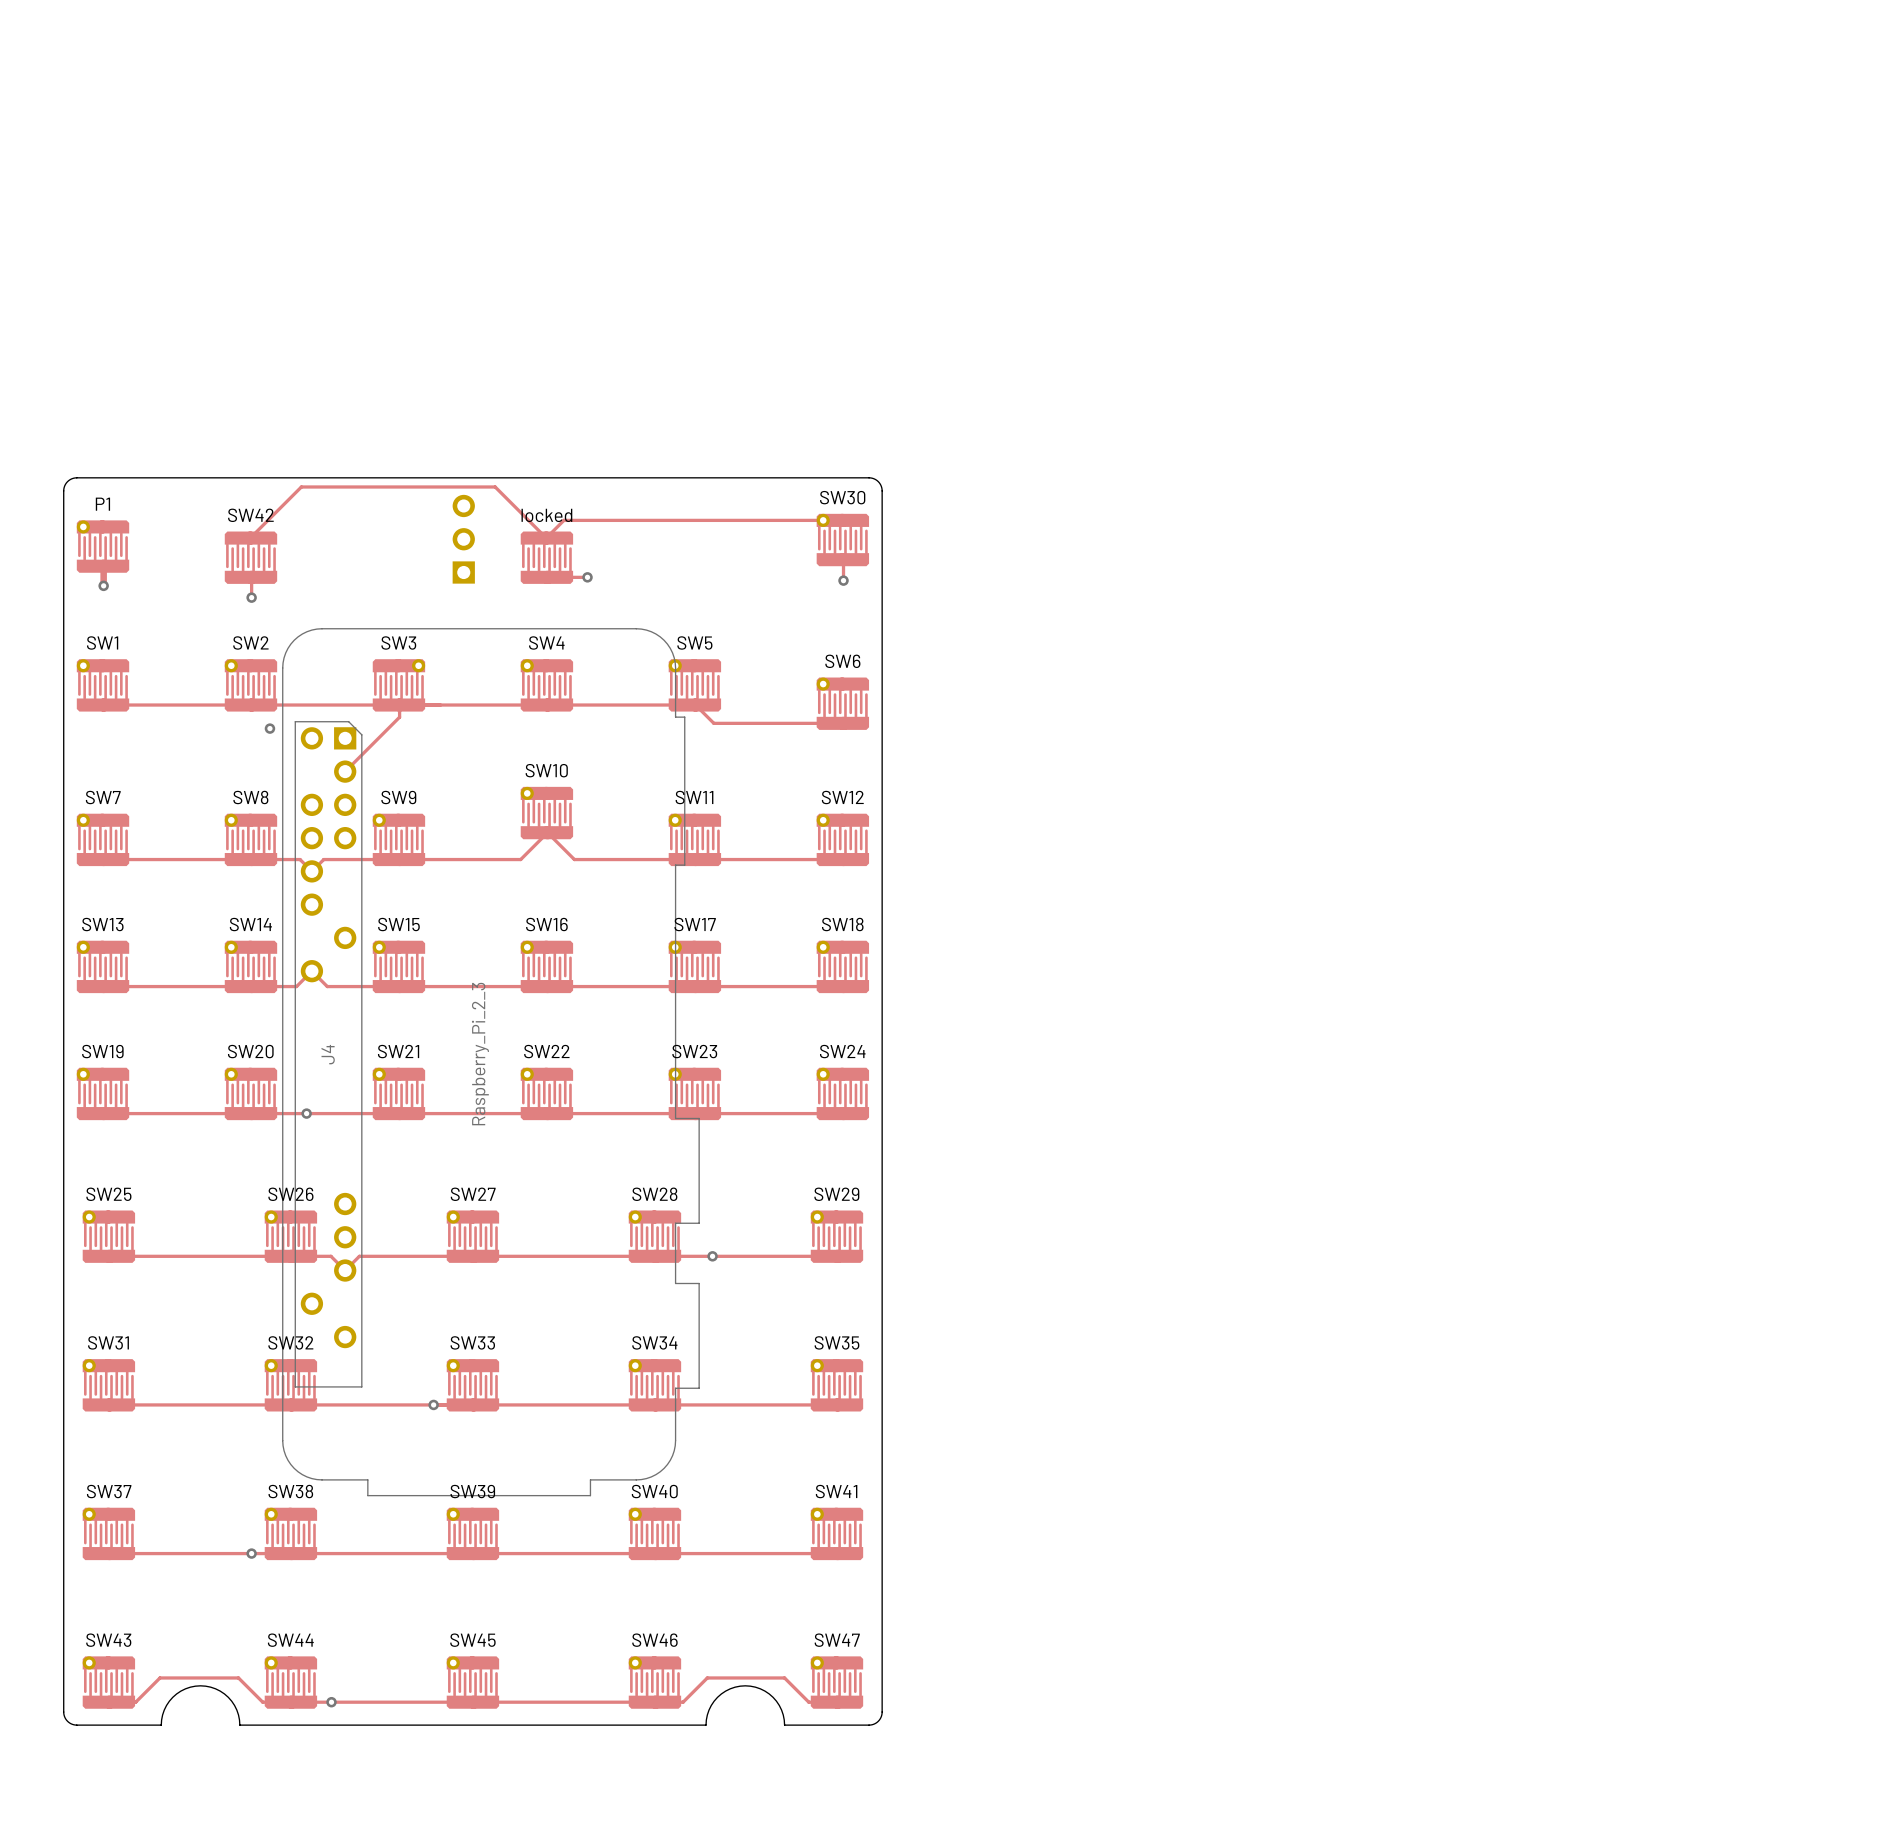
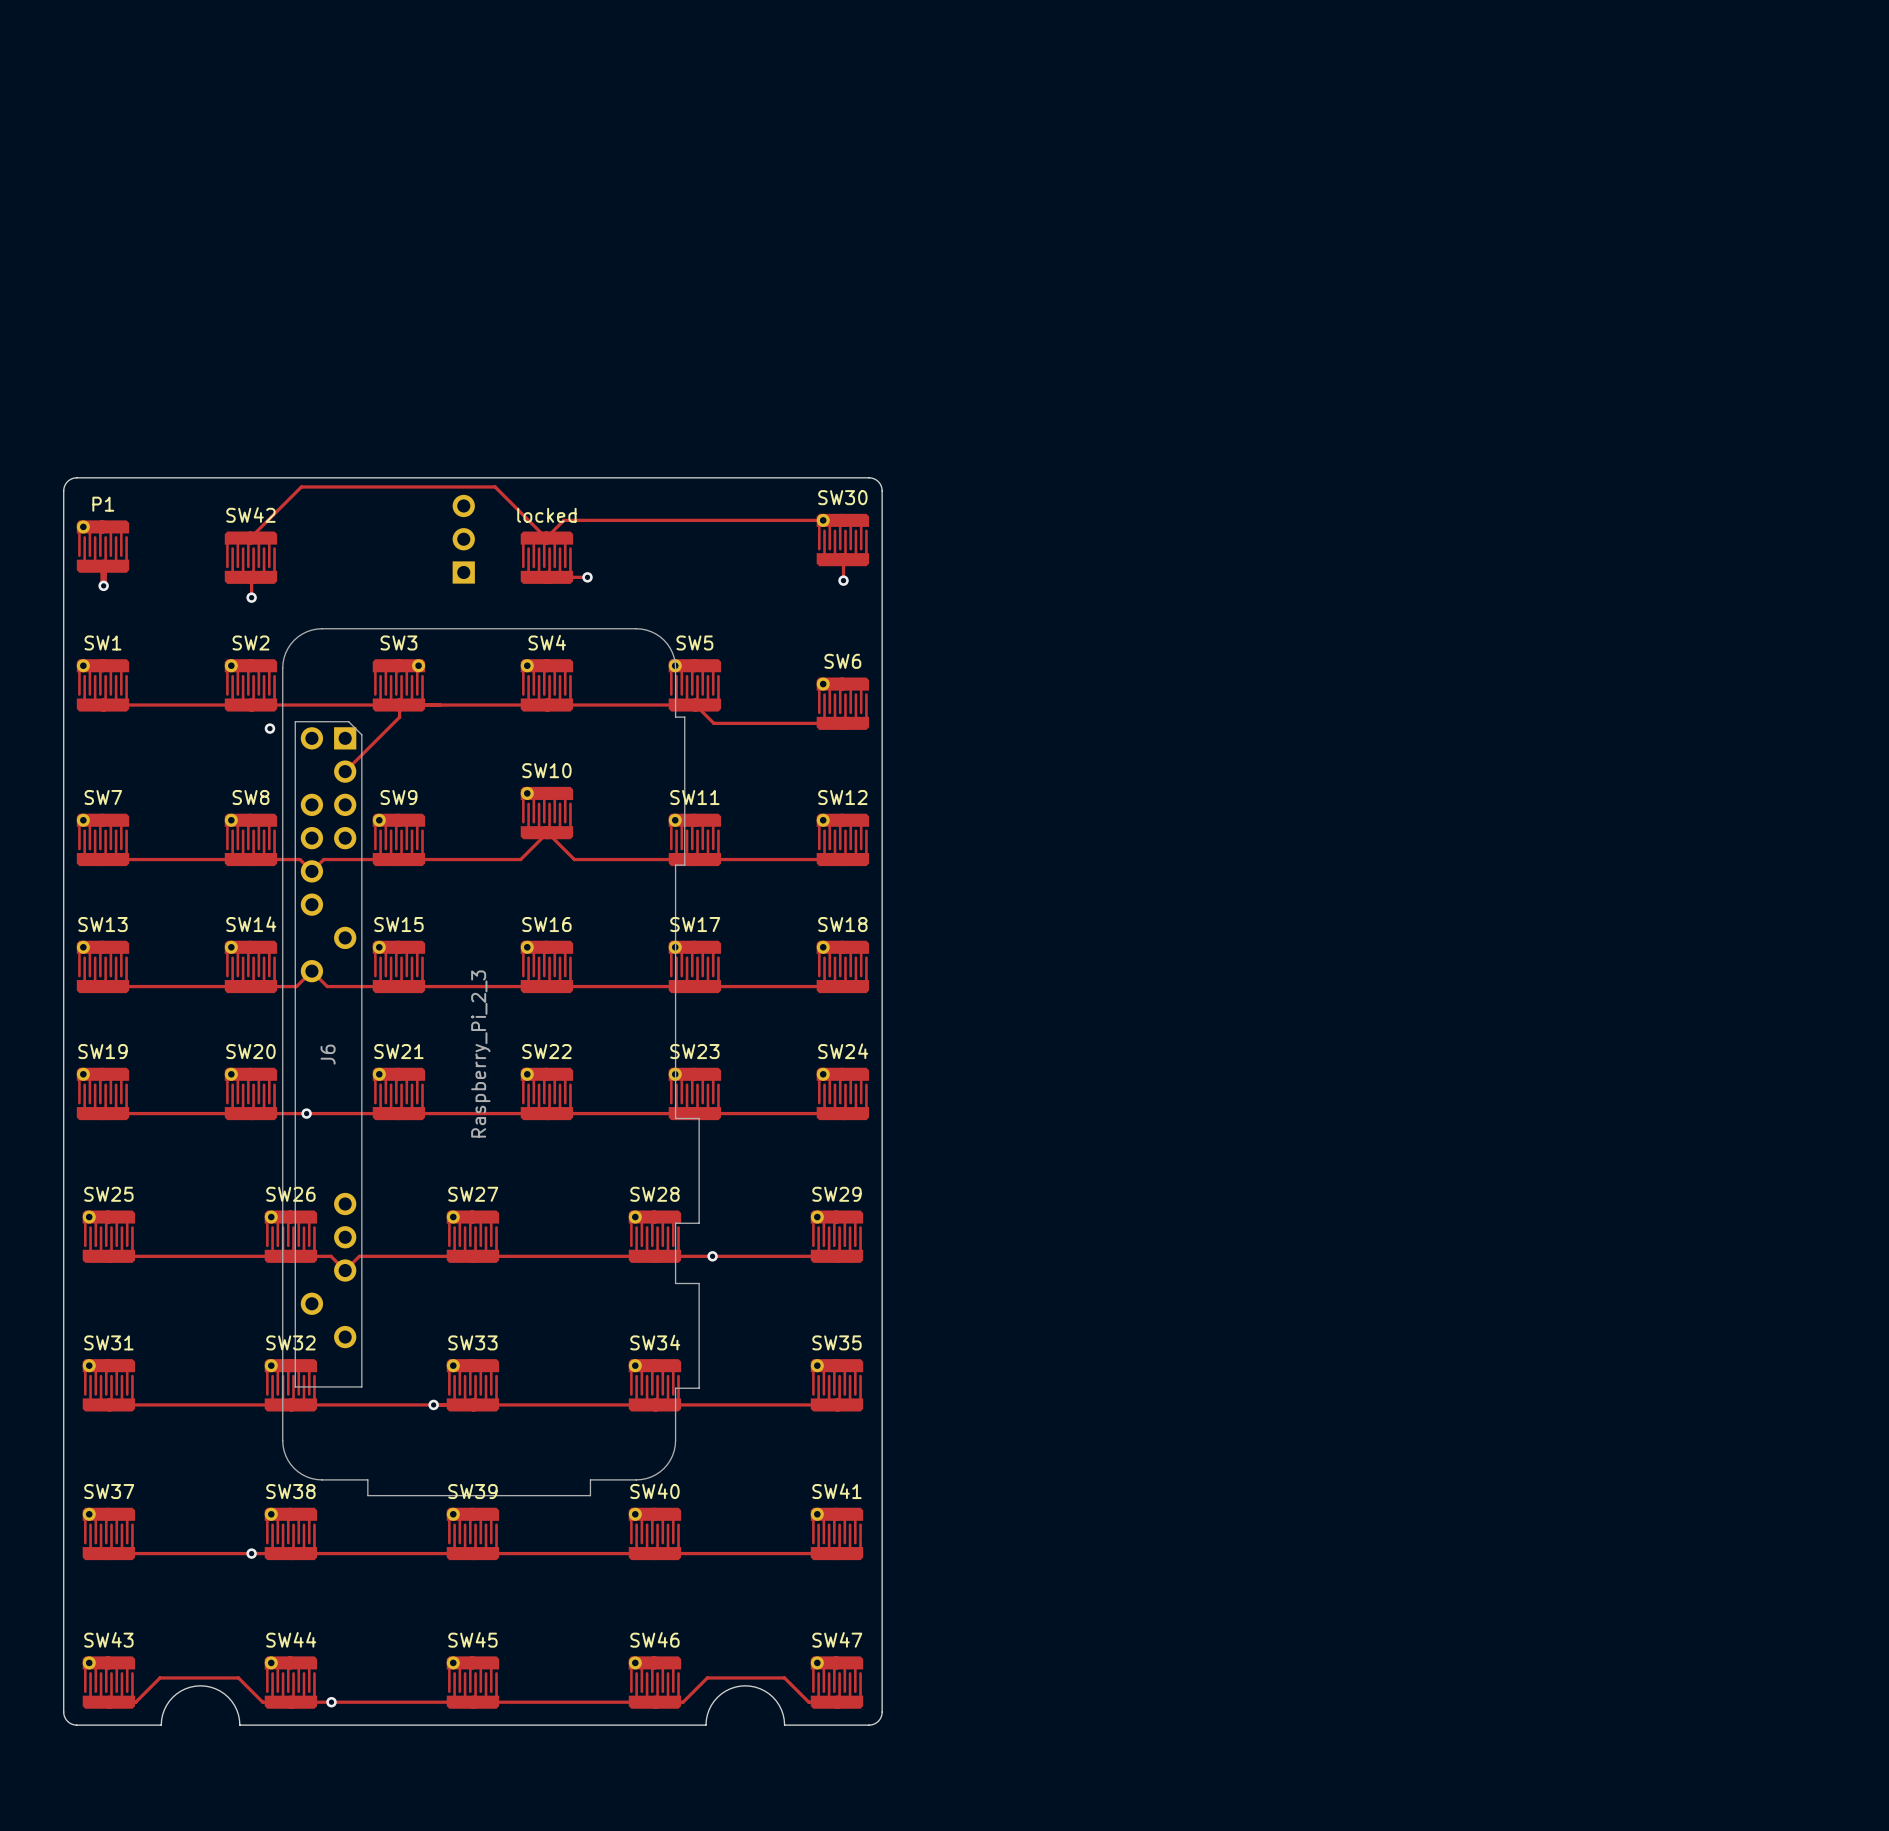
J4 name: J4 (328, 1054) -> J6 (328, 1054)

